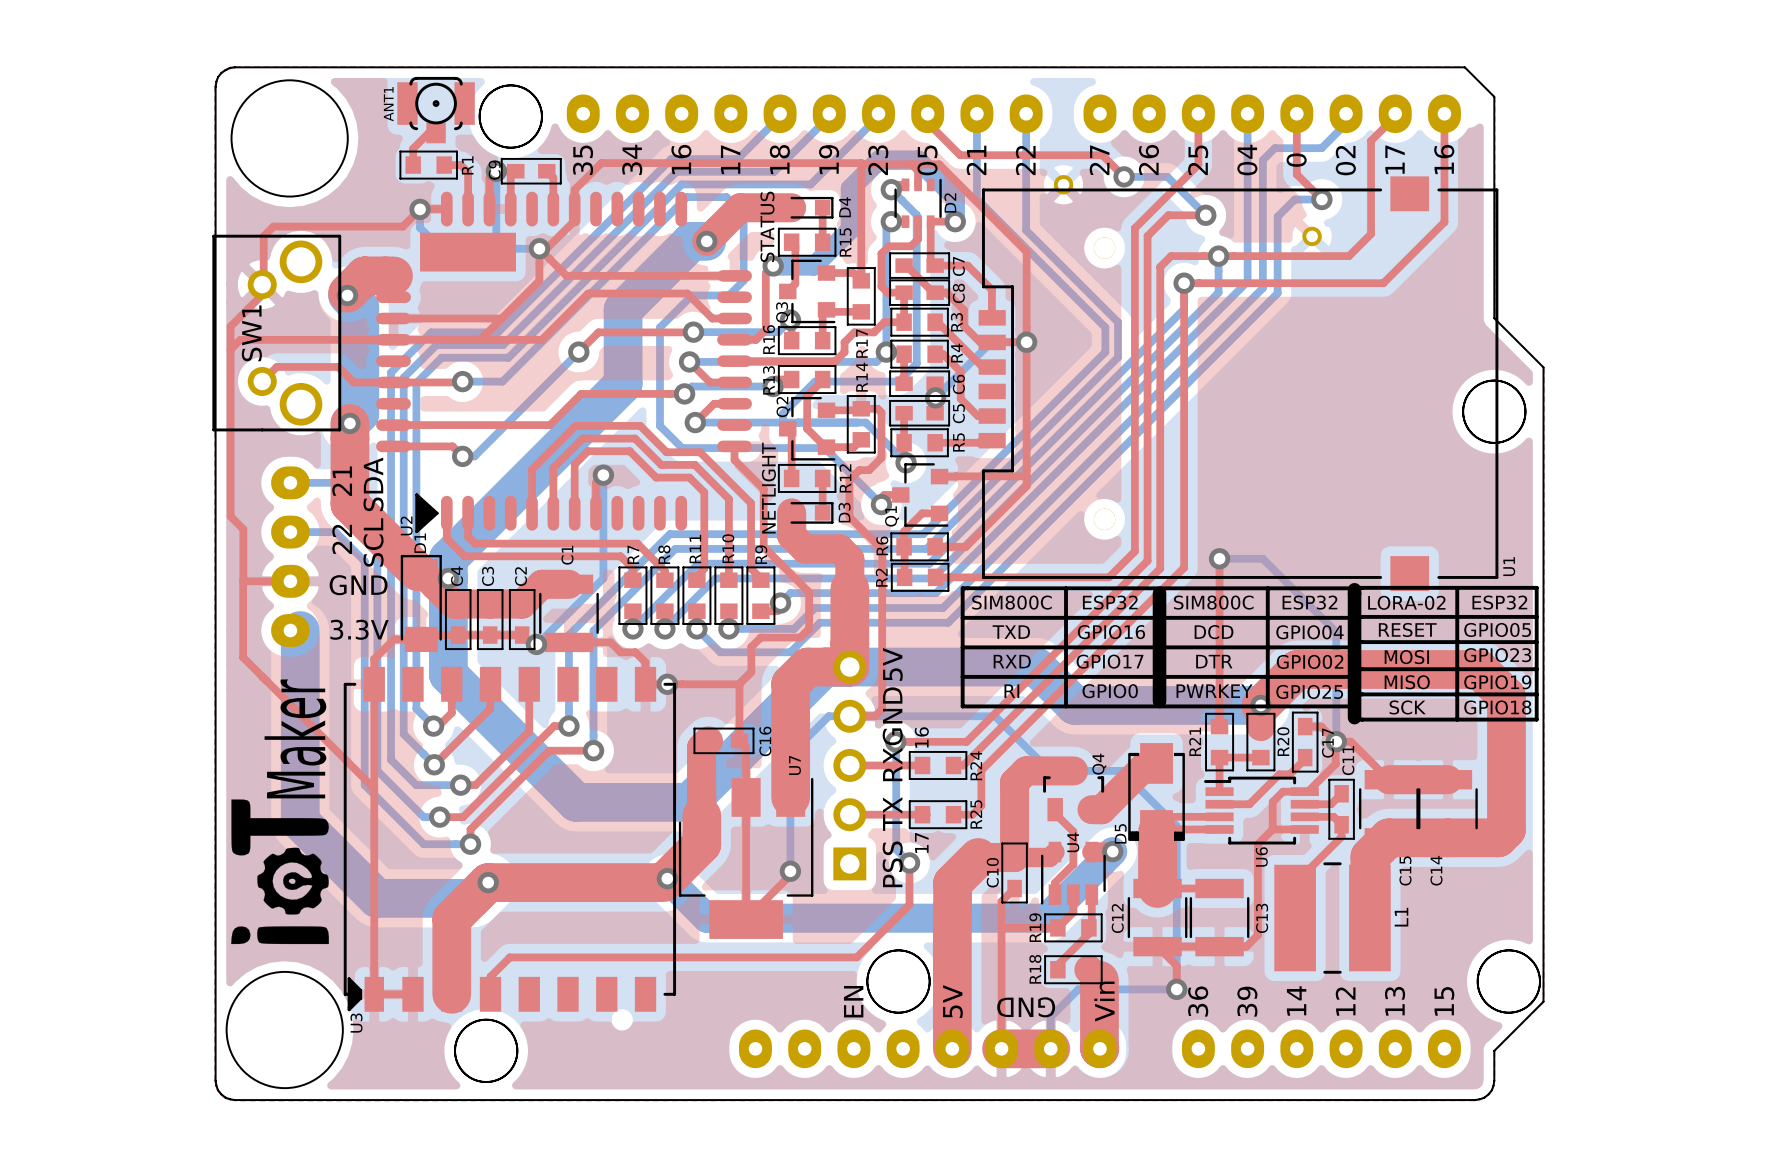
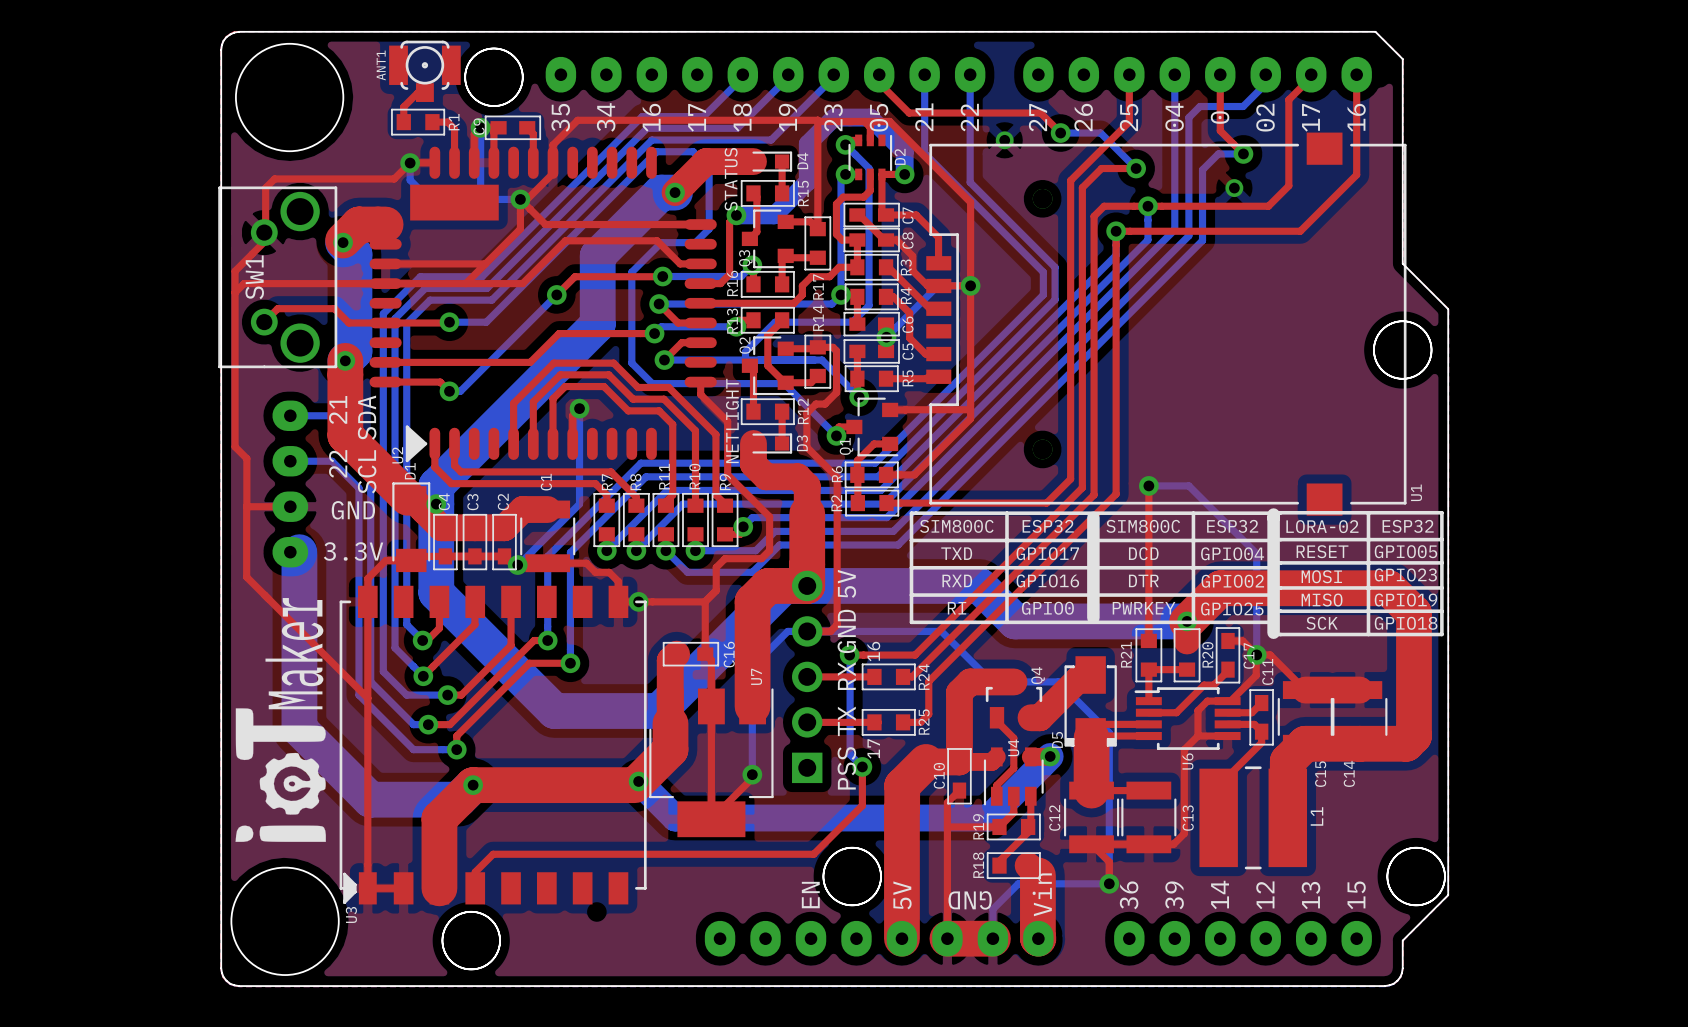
text: GPIO16 (1111, 632) -> GPIO17 (1047, 553)
text: GPIO17 (1110, 661) -> GPIO16 (1047, 580)

